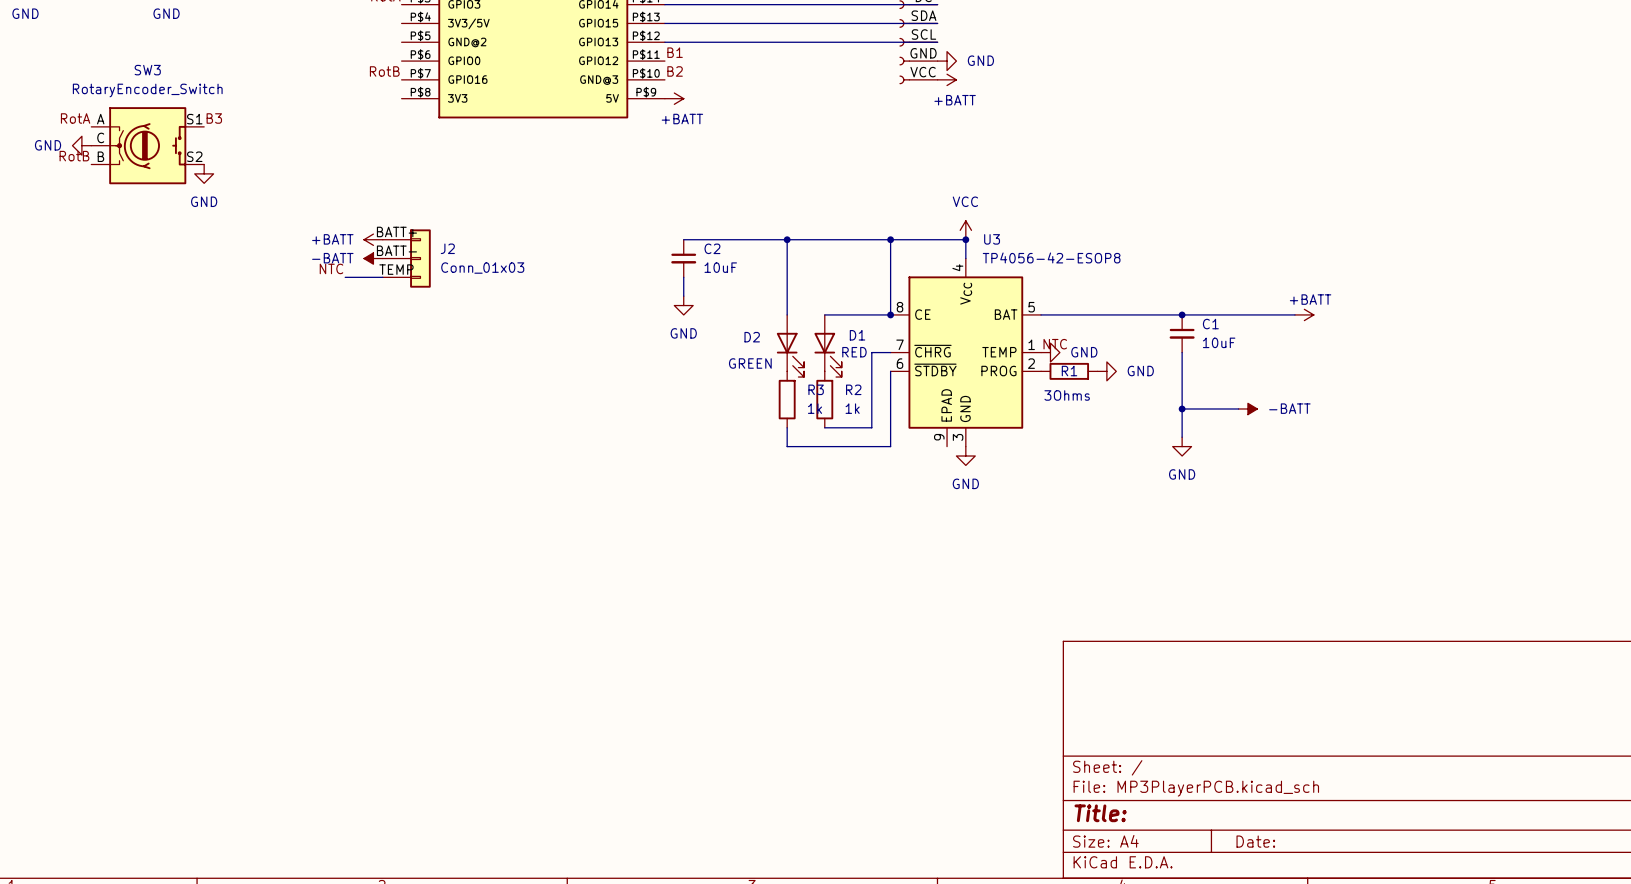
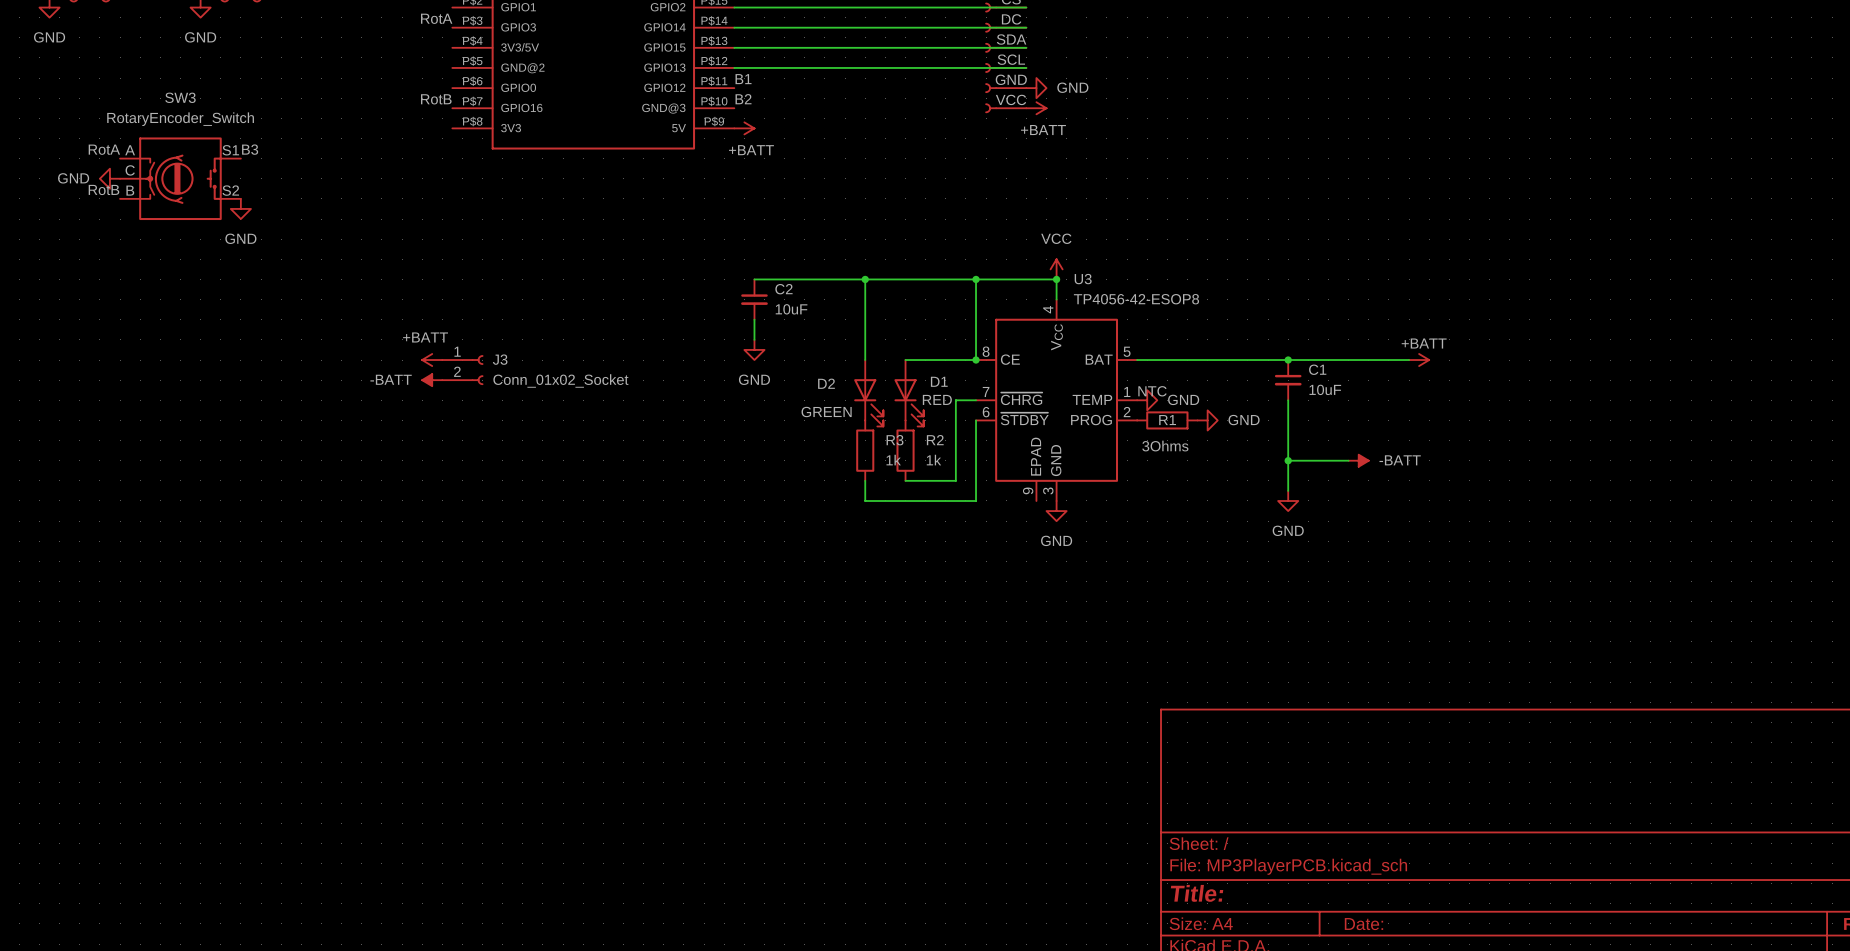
power symbol text position: +BATT (332, 239) -> +BATT (425, 337)
power symbol position: +BATT (373, 239) -> +BATT (432, 360)
power symbol position: -BATT (373, 258) -> -BATT (432, 380)
J2: Conn_01x03 (406, 258) -> none
label: NTC (331, 268) -> none
wire: (345, 277) (382, 277) -> none
J3: none -> Conn_01x02_Socket (462, 370)

